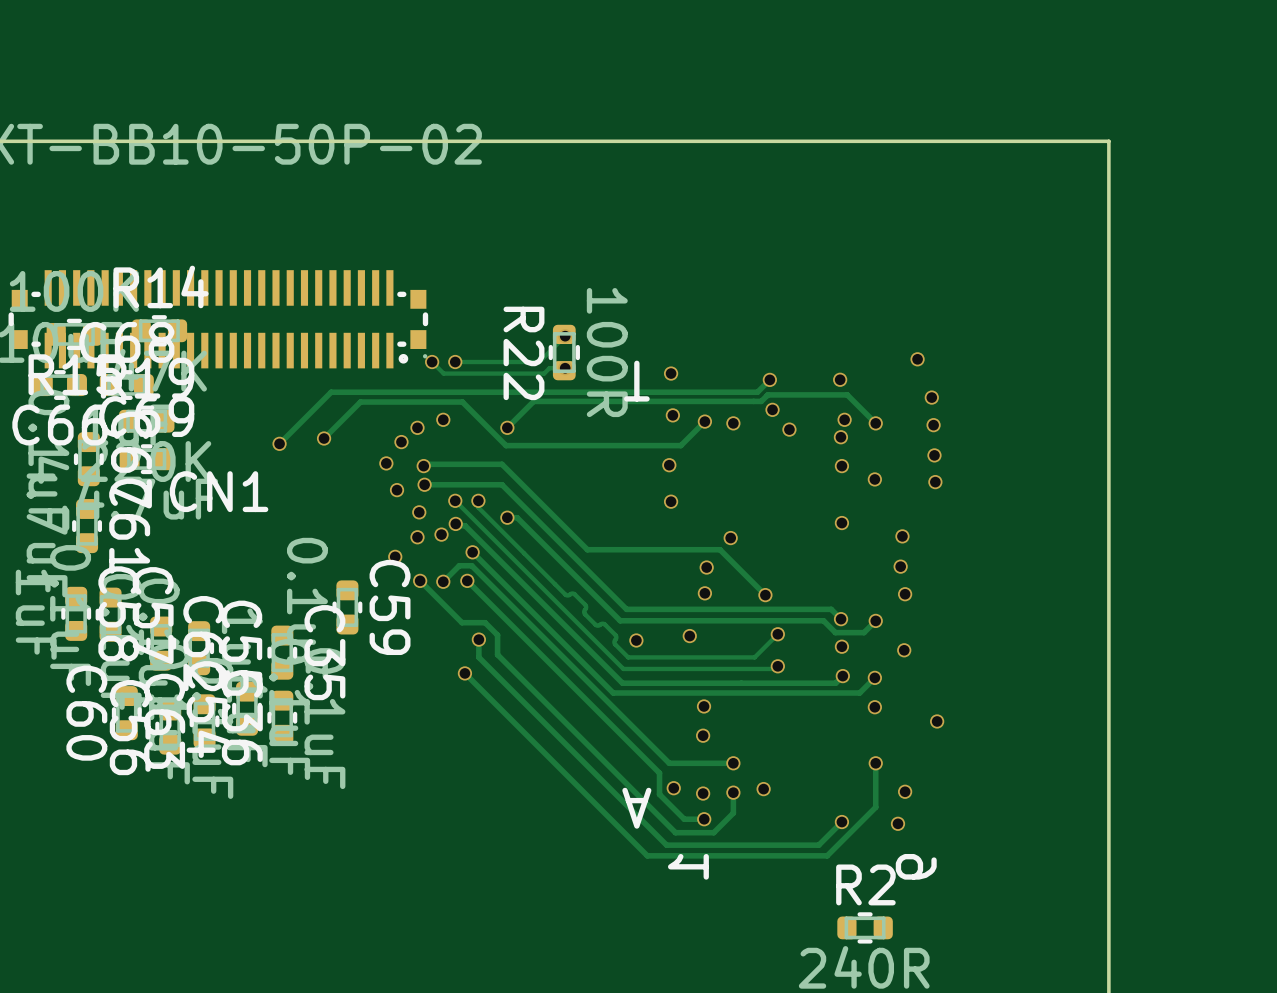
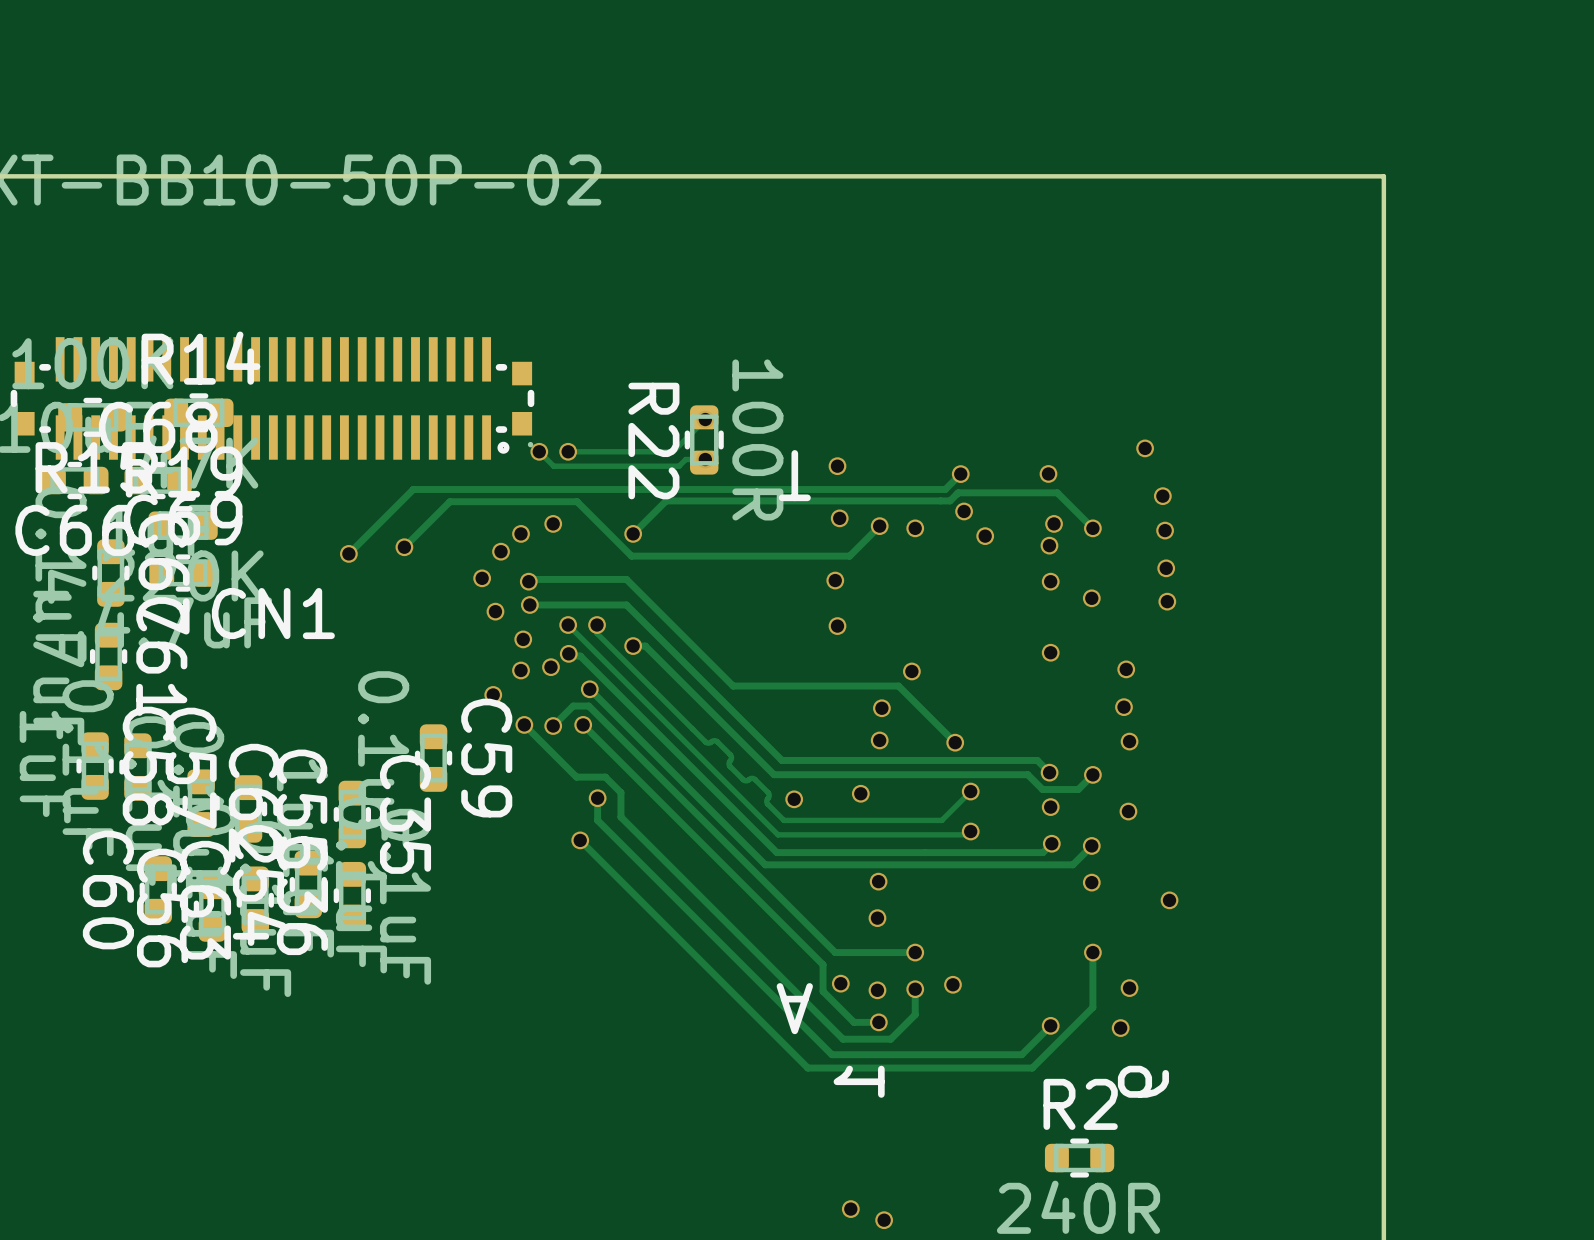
via: none -> (850, 1209)
via: none -> (884, 1220)

